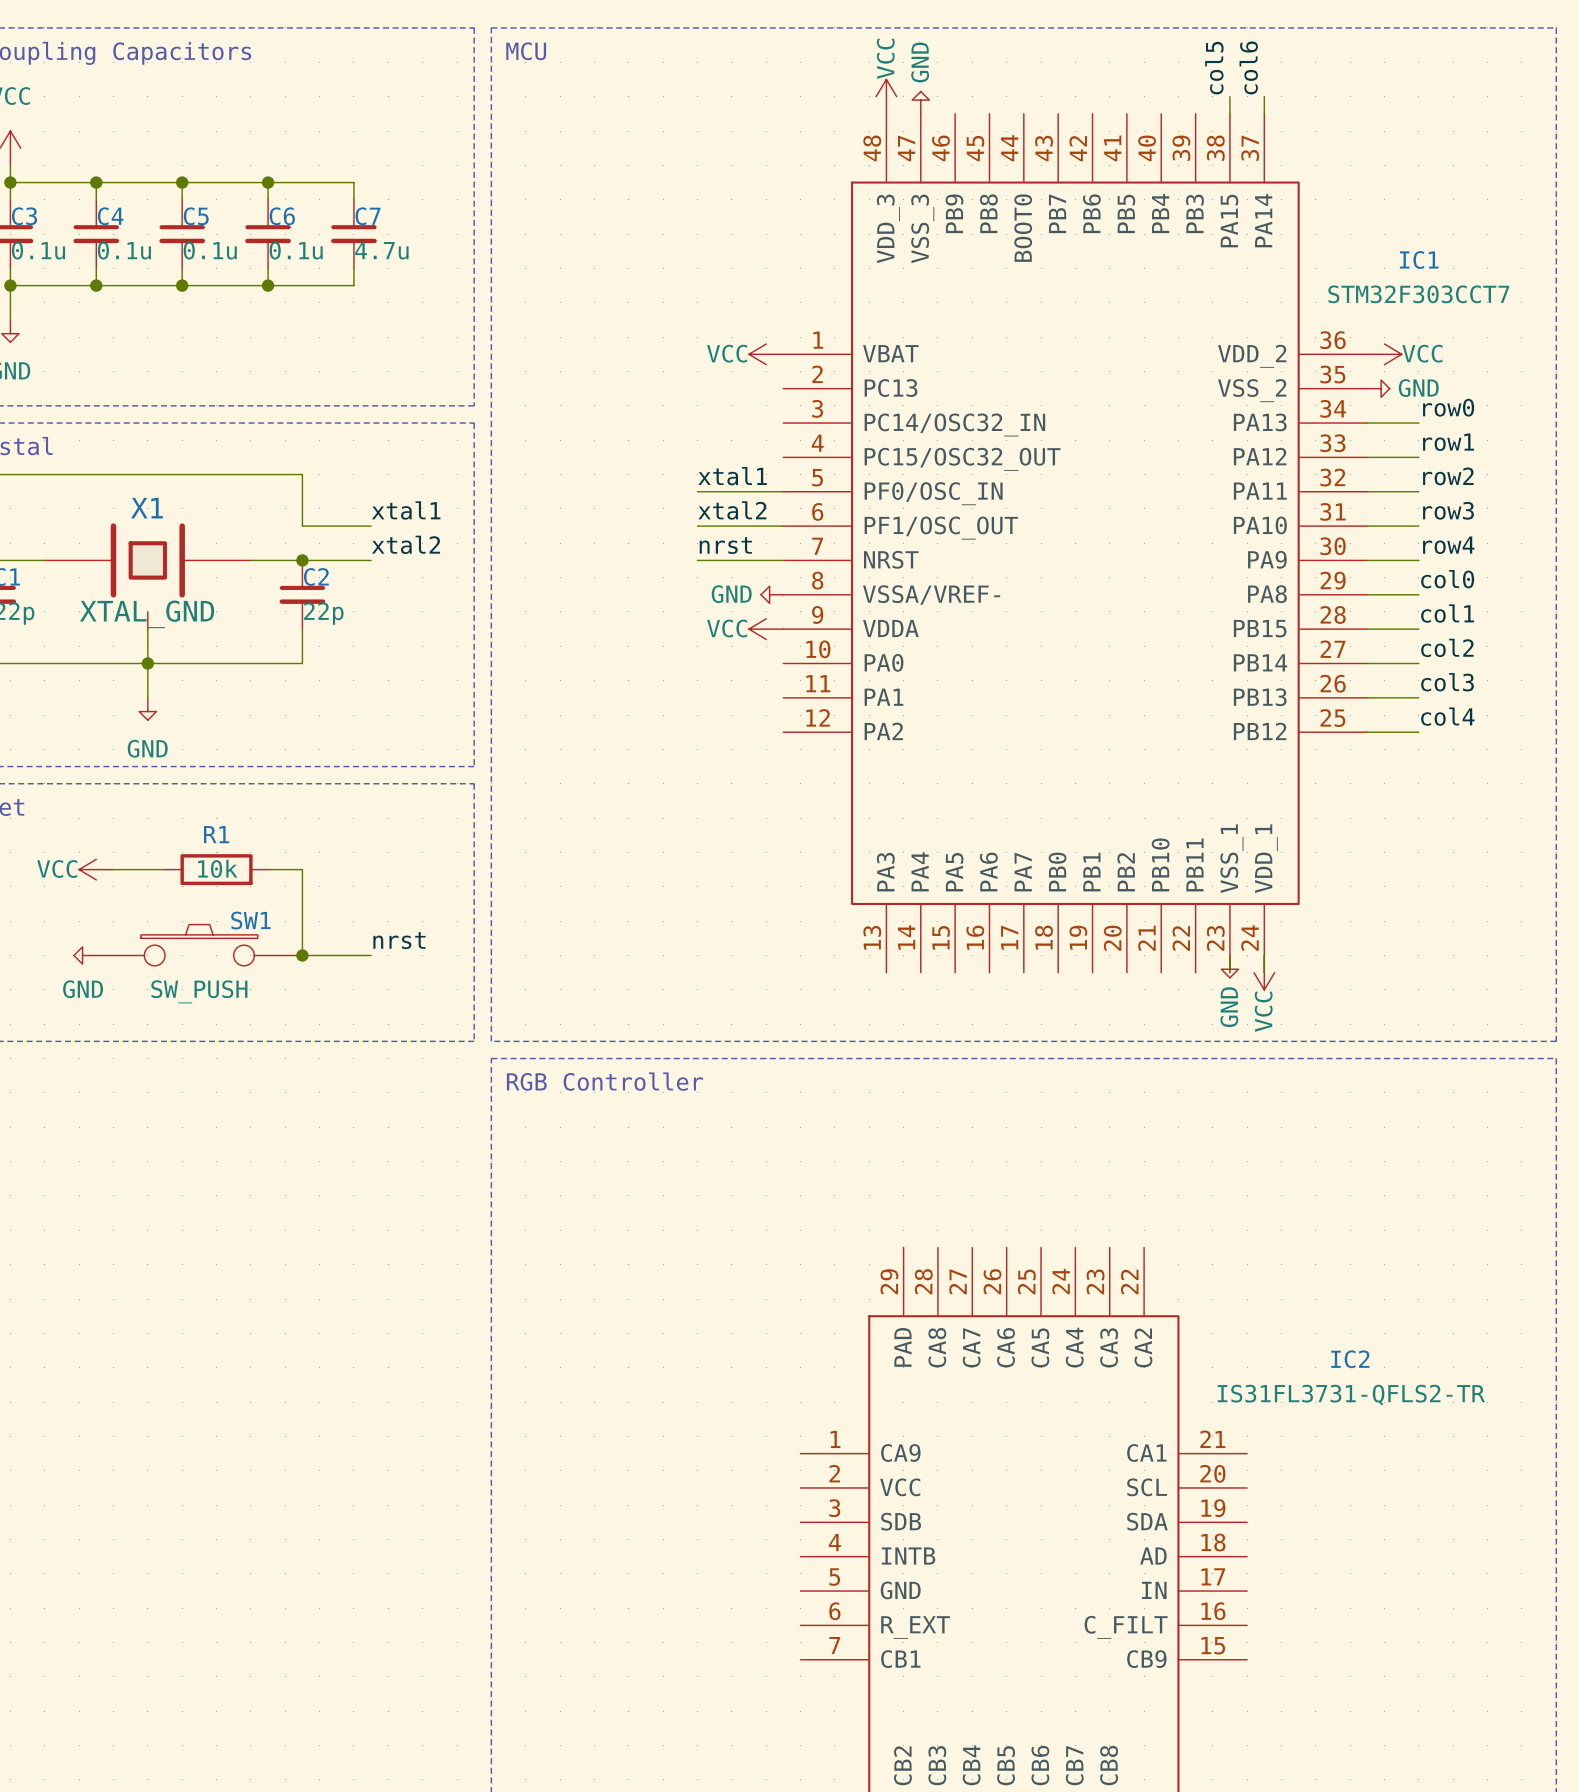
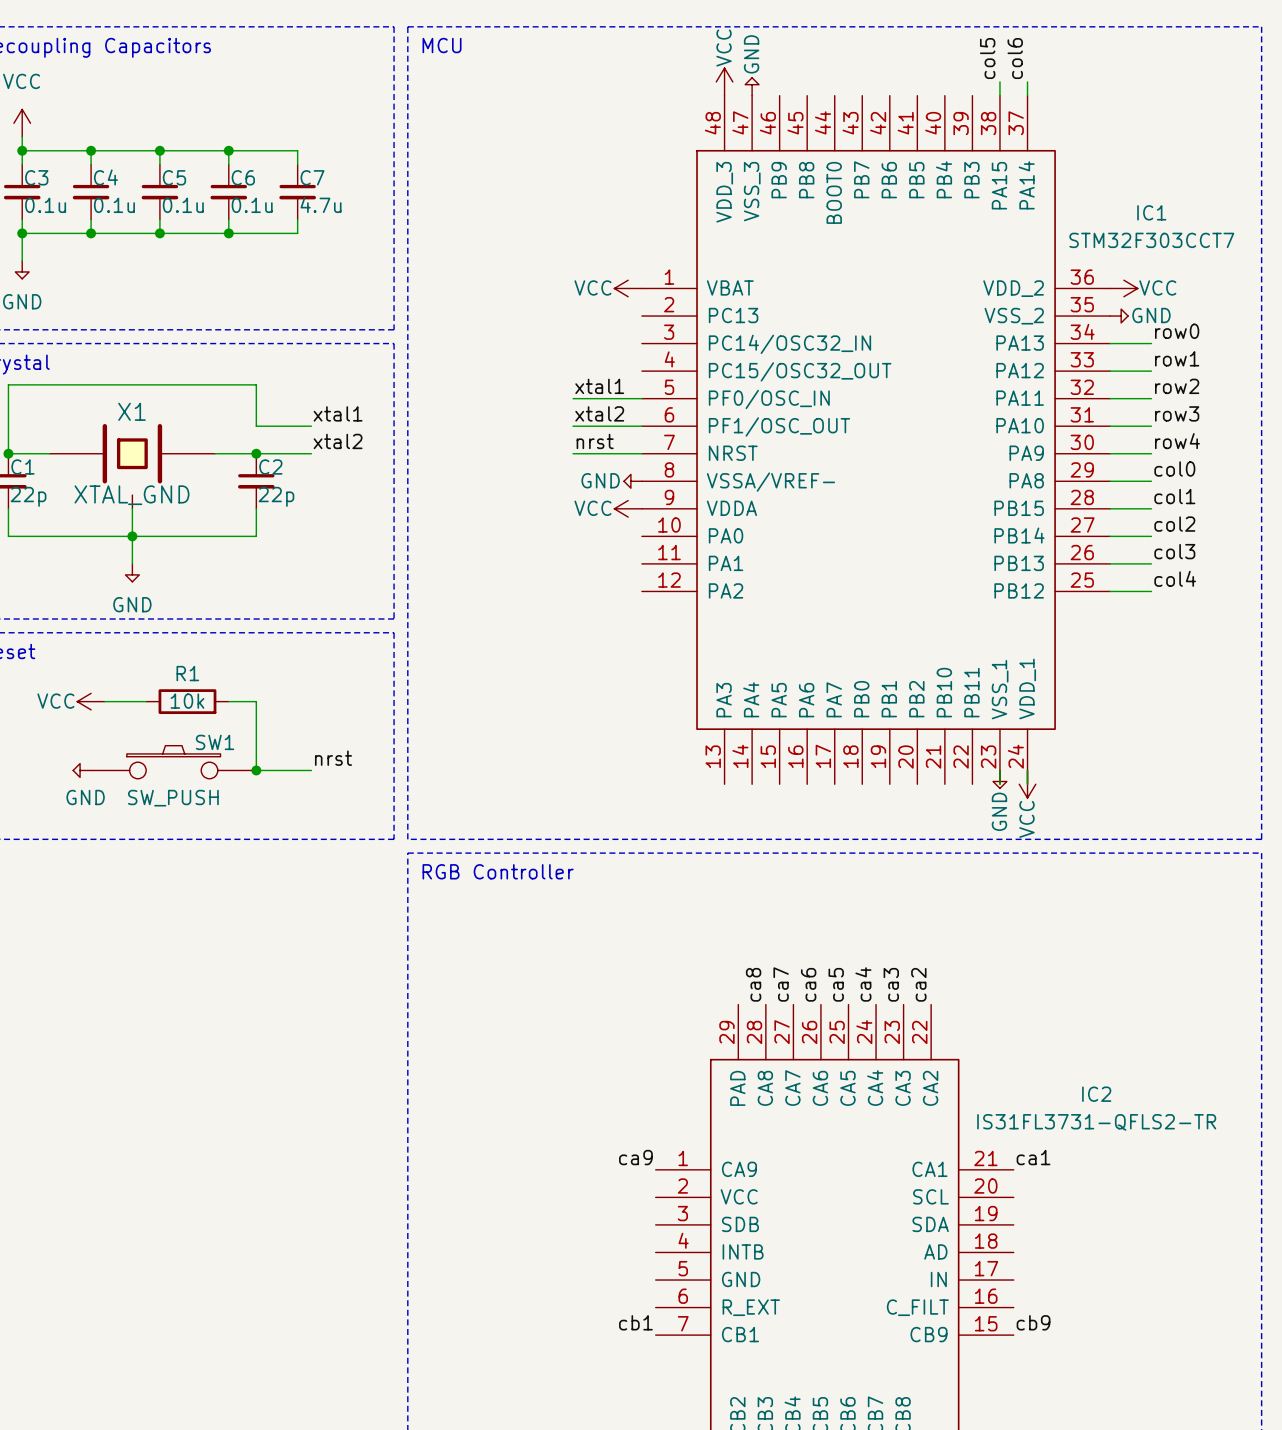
label: none -> ca8 (753, 984)
label: none -> ca7 (781, 984)
label: none -> ca6 (808, 984)
label: none -> ca4 (863, 984)
label: none -> ca3 (891, 984)
label: none -> ca5 (836, 984)
label: none -> ca2 (918, 984)
label: none -> ca9 (635, 1157)
label: none -> ca1 (1033, 1157)
label: none -> cb1 (635, 1322)
label: none -> cb9 (1033, 1322)

